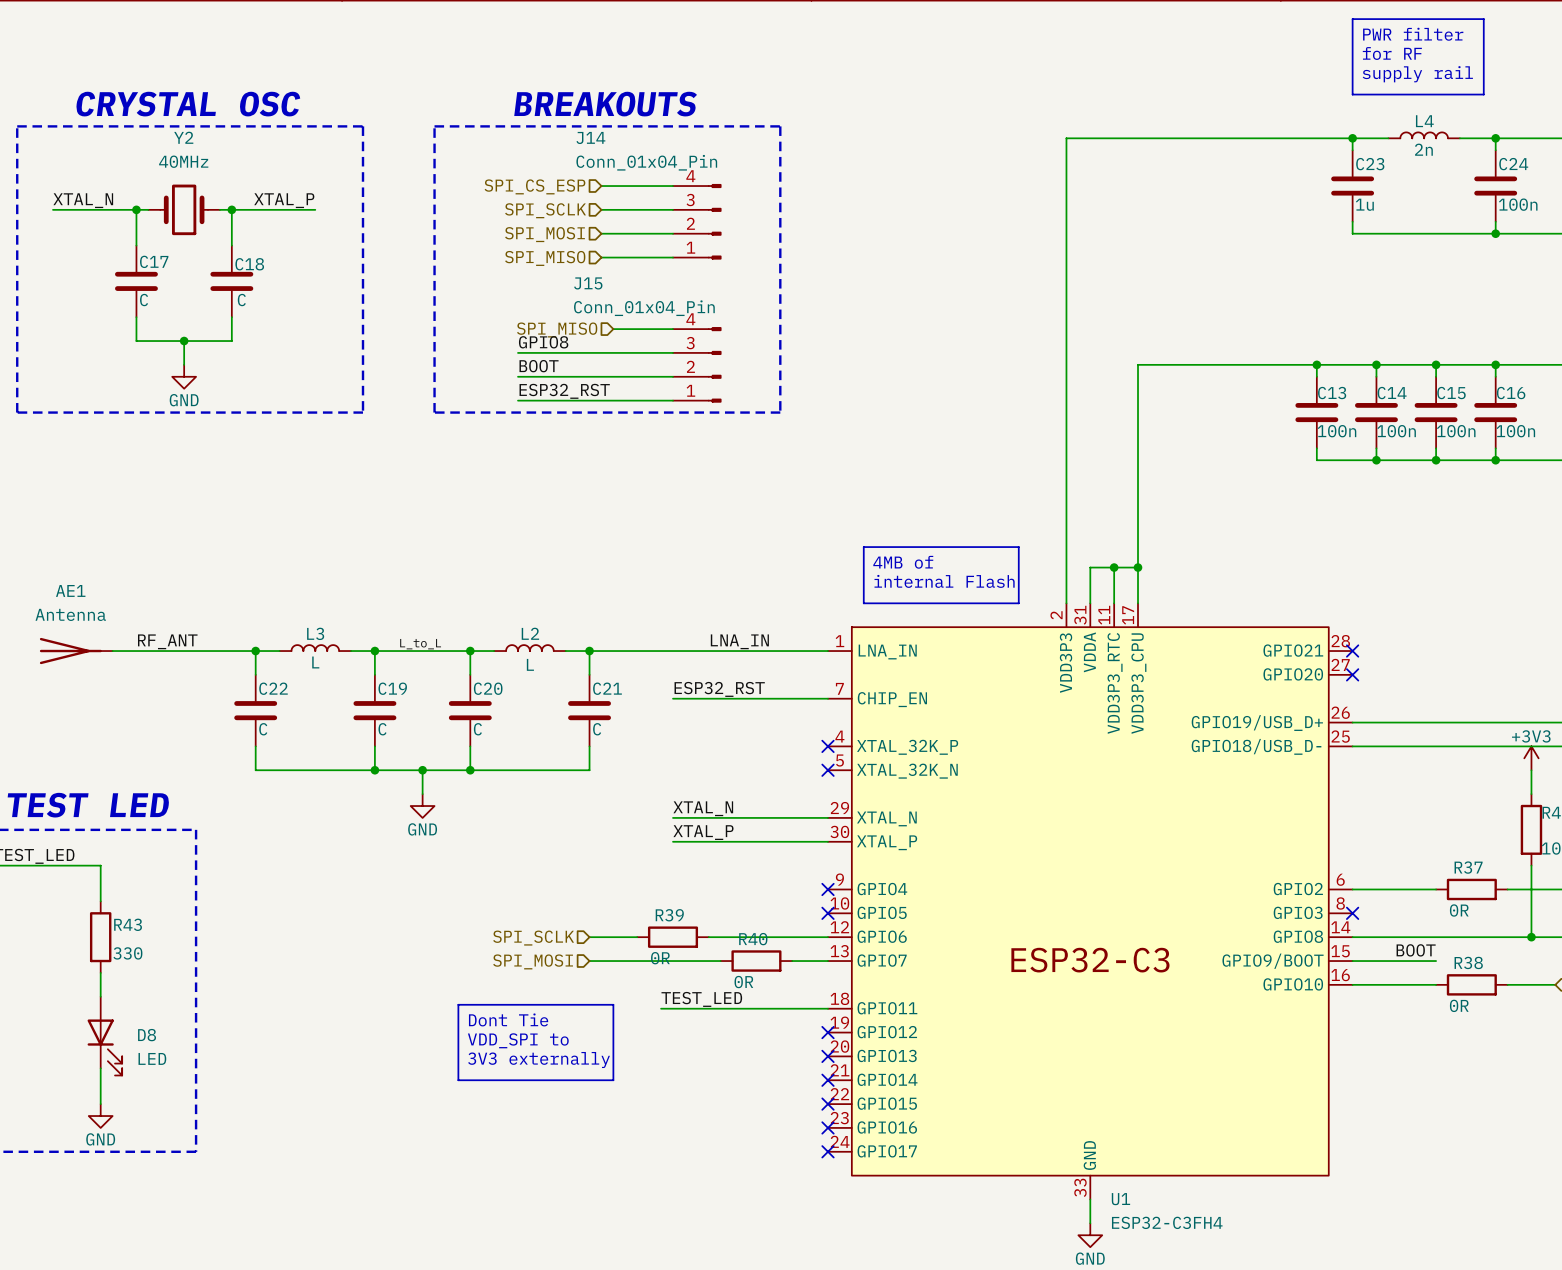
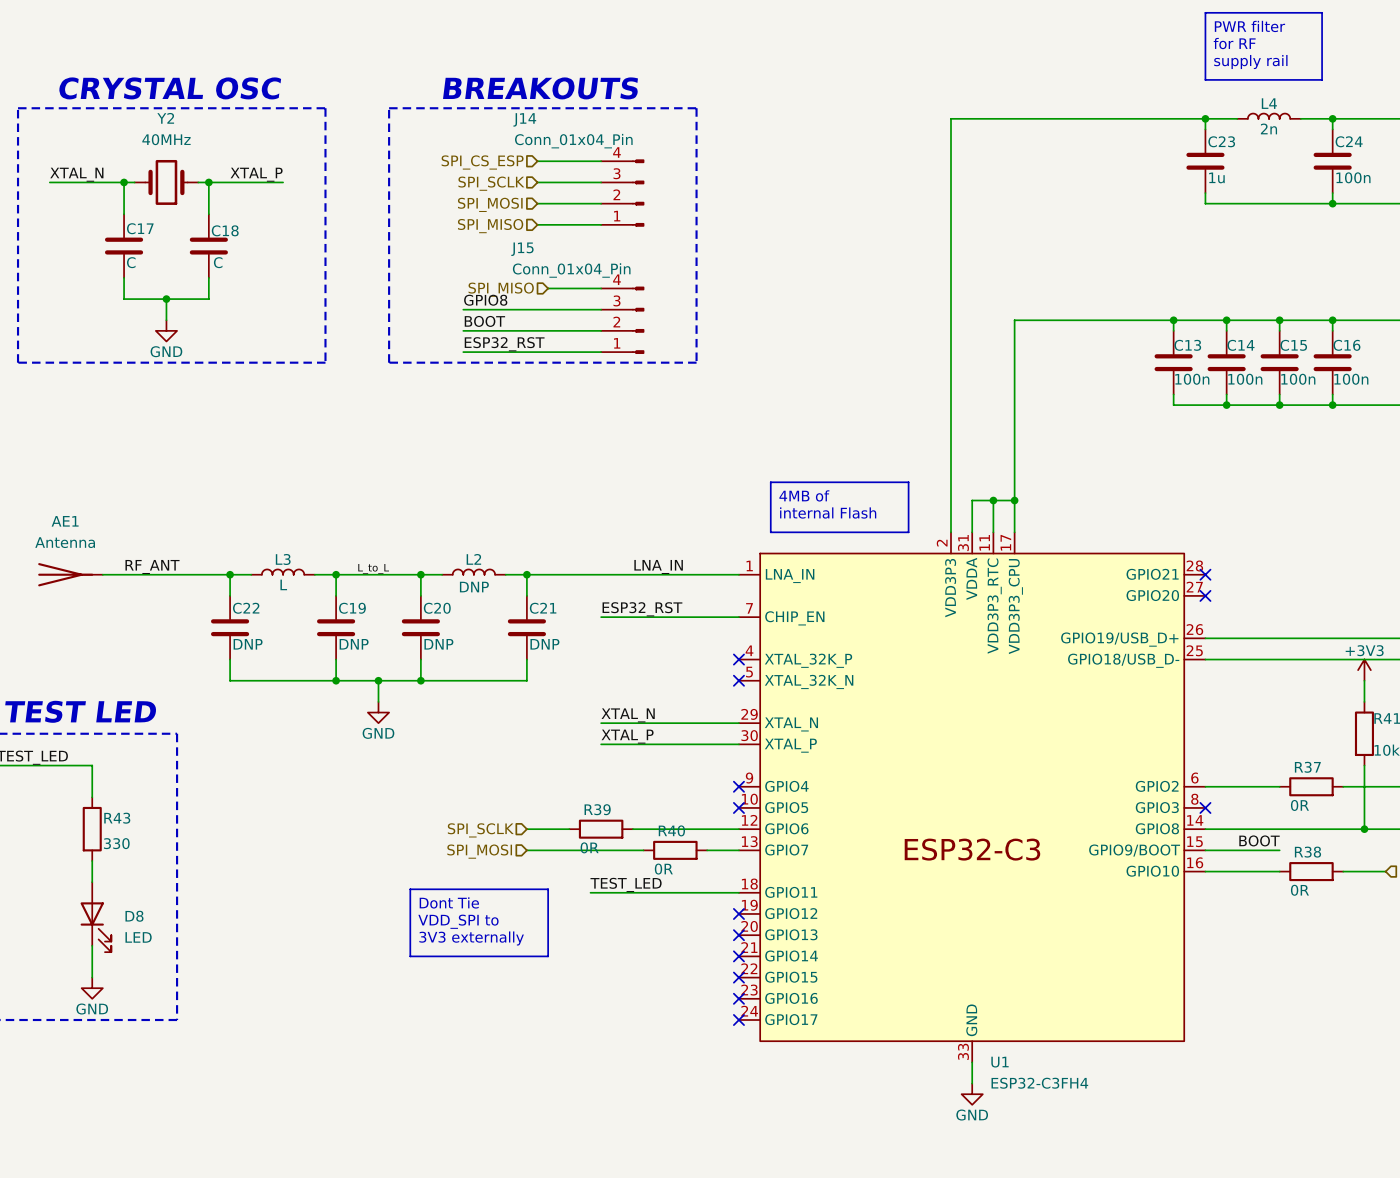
L2 value: L (530, 664) -> DNP (474, 587)
C22 value: C (263, 729) -> DNP (248, 644)
C19 value: C (382, 729) -> DNP (354, 644)
C20 value: C (477, 729) -> DNP (438, 644)
C21 value: C (597, 729) -> DNP (544, 644)

